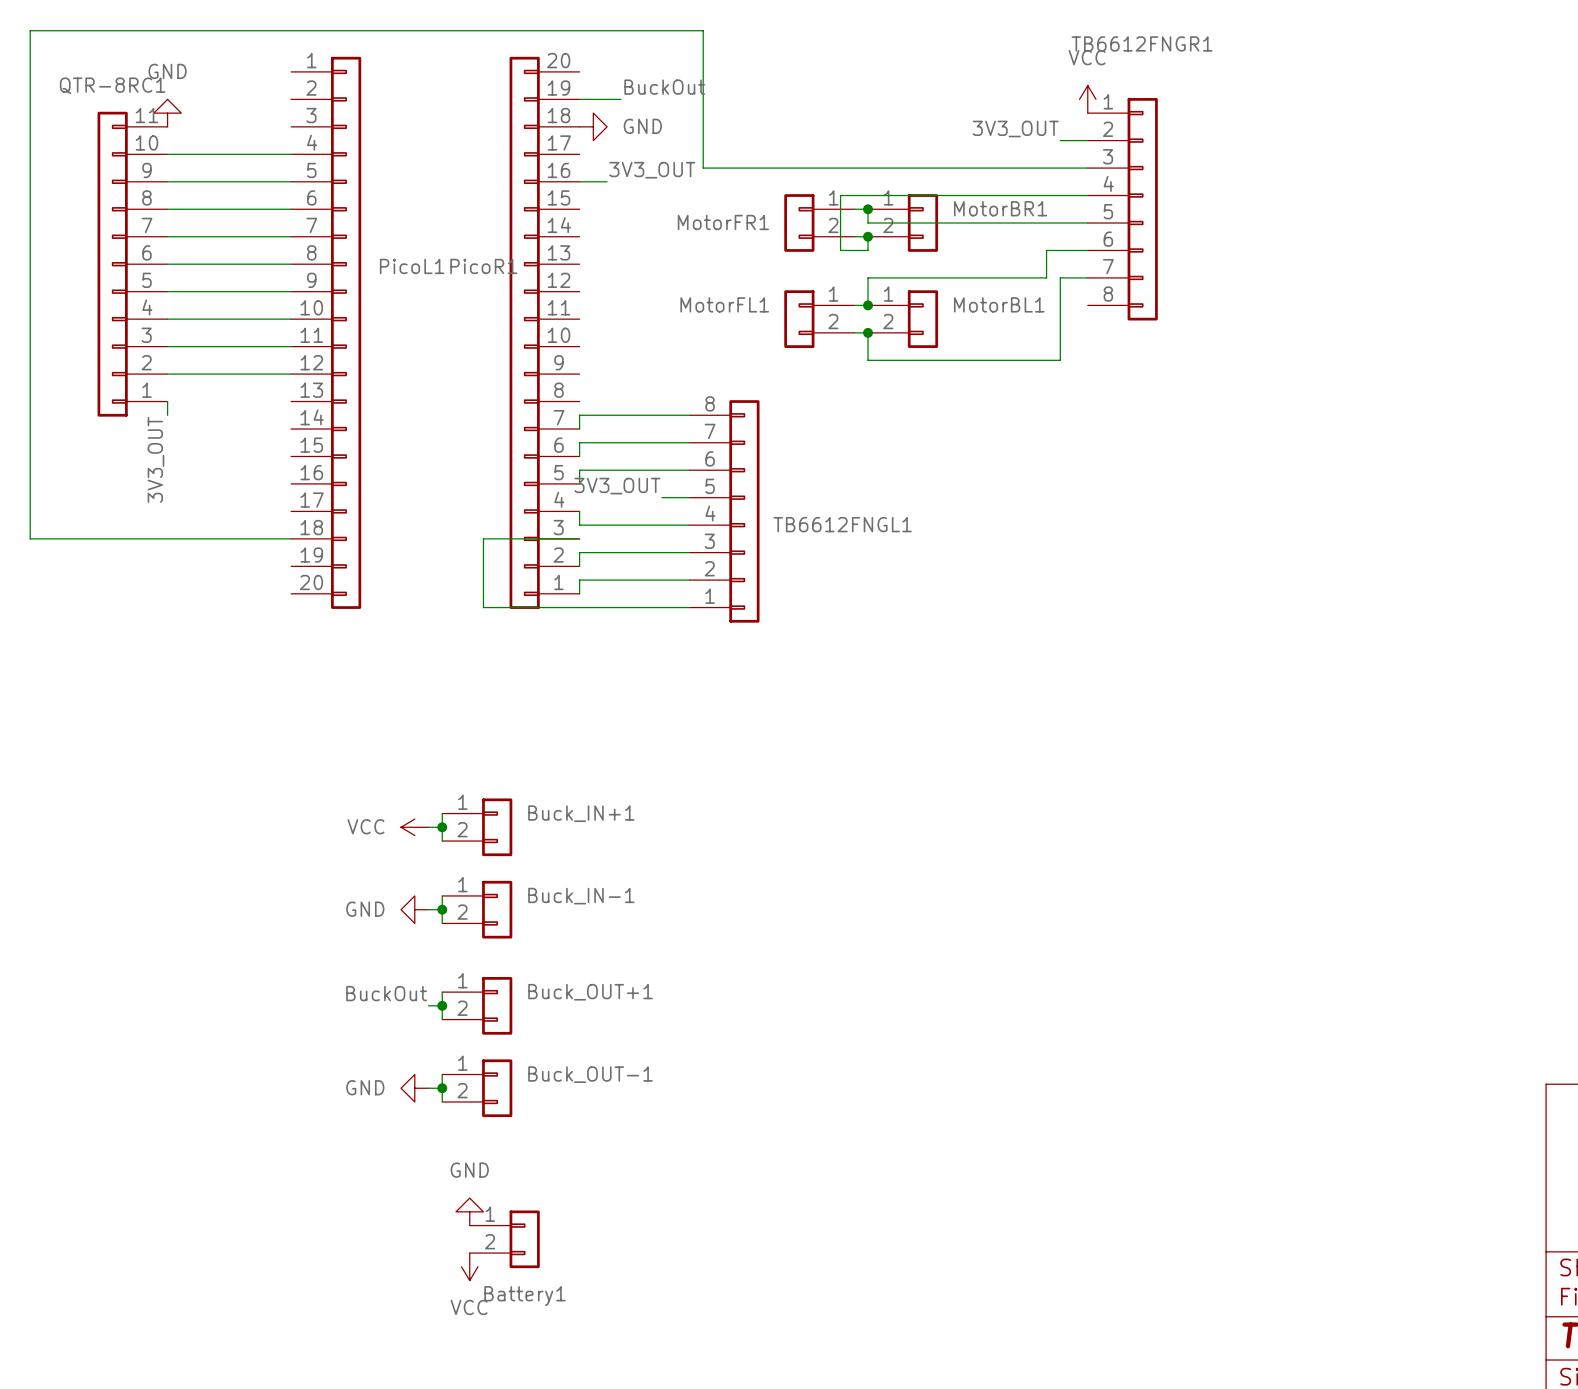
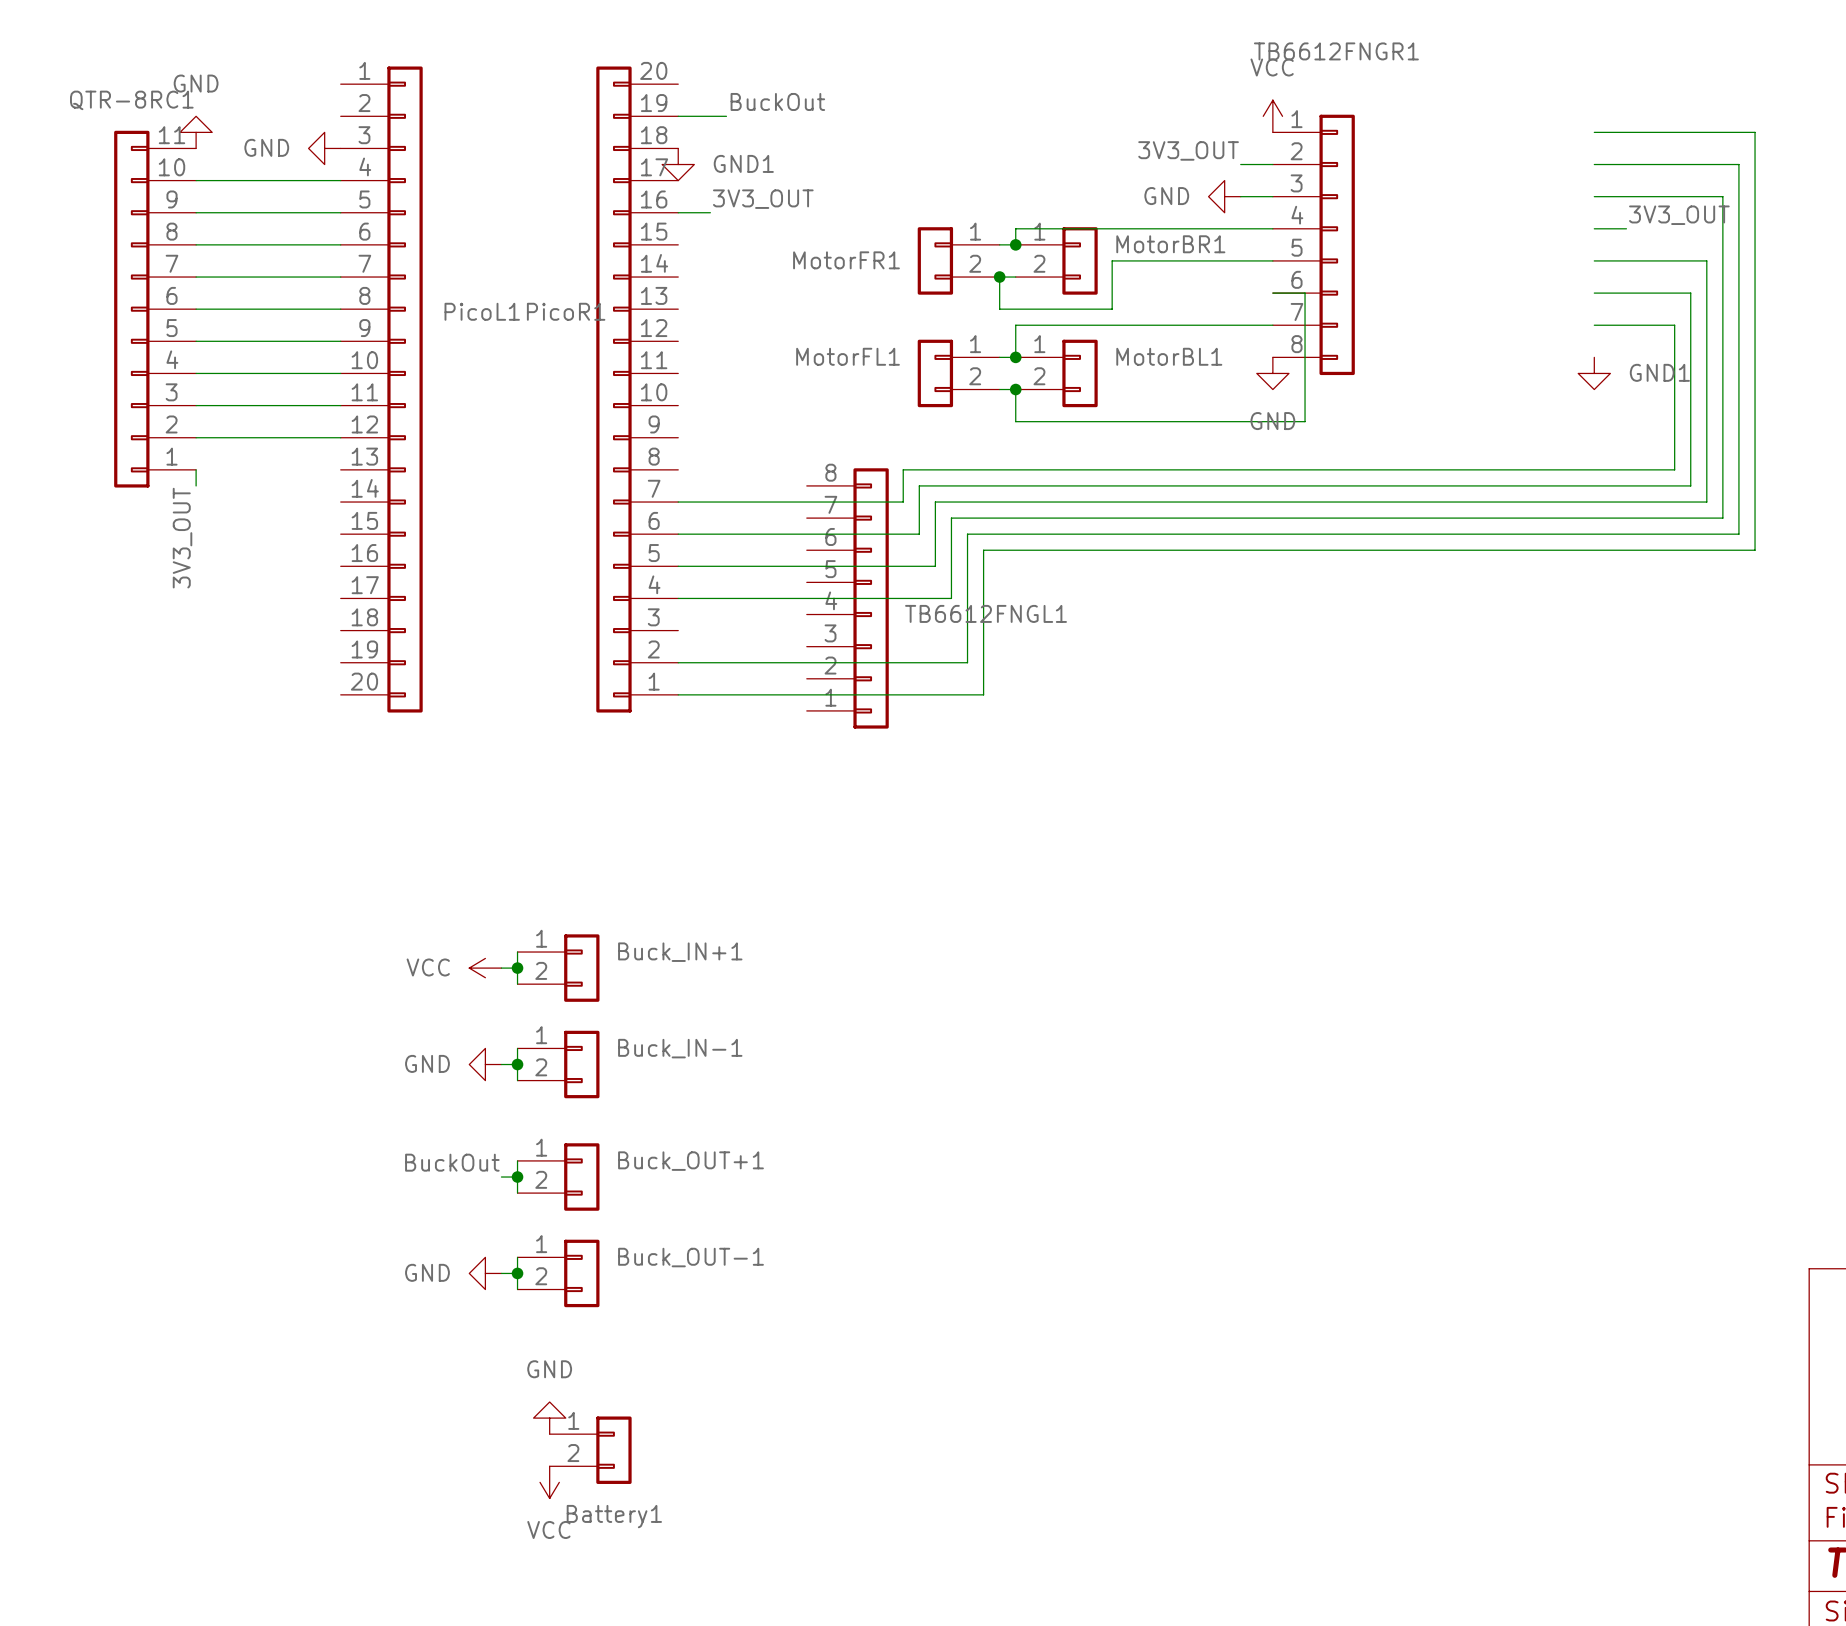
power symbol: none -> GND (324, 148)
power symbol: GND (593, 126) -> none
power symbol: none -> GND1 (678, 164)
power symbol: none -> GND (1224, 196)
wire: (1060, 168) (703, 168) (703, 30) (30, 30) (30, 538) (291, 538) -> none
label: none -> 3V3_OUT (1679, 215)
wire: (868, 195) (840, 195) (840, 250) (868, 250) (868, 236) -> (1015, 228) (1015, 244)
wire: none -> (1594, 228) (1626, 228)
wire: (868, 209) (868, 223) (950, 223) -> (999, 277) (999, 309) (1112, 309) (1112, 260)
junction position: (868, 236) -> (999, 277)
wire: (1087, 250) (1046, 250) (1046, 277) -> (1240, 325) (1224, 325)
wire: (1060, 277) (1060, 360) -> (1272, 293) (1305, 293) (1305, 421) (1240, 421)
power symbol: none -> GND (1272, 373)
power symbol: none -> GND1 (1594, 373)
wire: (689, 415) (579, 415) (579, 429) -> (1594, 325) (1674, 325) (1674, 469) (903, 469) (903, 502) (678, 502)
wire: (689, 442) (579, 442) (579, 456) -> (1594, 293) (1690, 293) (1690, 485) (919, 485) (919, 534) (678, 534)
wire: (689, 470) (579, 470) (579, 483) -> (1594, 260) (1706, 260) (1706, 502) (935, 502) (935, 566) (678, 566)
label: 3V3_OUT (617, 486) -> none
wire: (662, 497) (689, 497) -> none
wire: (579, 511) (579, 525) (689, 525) -> (678, 598) (951, 598) (951, 518) (1722, 518) (1722, 196) (1594, 196)
wire: (579, 538) (483, 538) (483, 607) (689, 607) -> none
wire: (689, 552) (579, 552) (579, 566) -> (1594, 164) (1738, 164) (1738, 534) (967, 534) (967, 662) (678, 662)
wire: (689, 580) (579, 580) (579, 593) -> (1594, 132) (1755, 132) (1755, 550) (983, 550) (983, 694) (678, 694)

